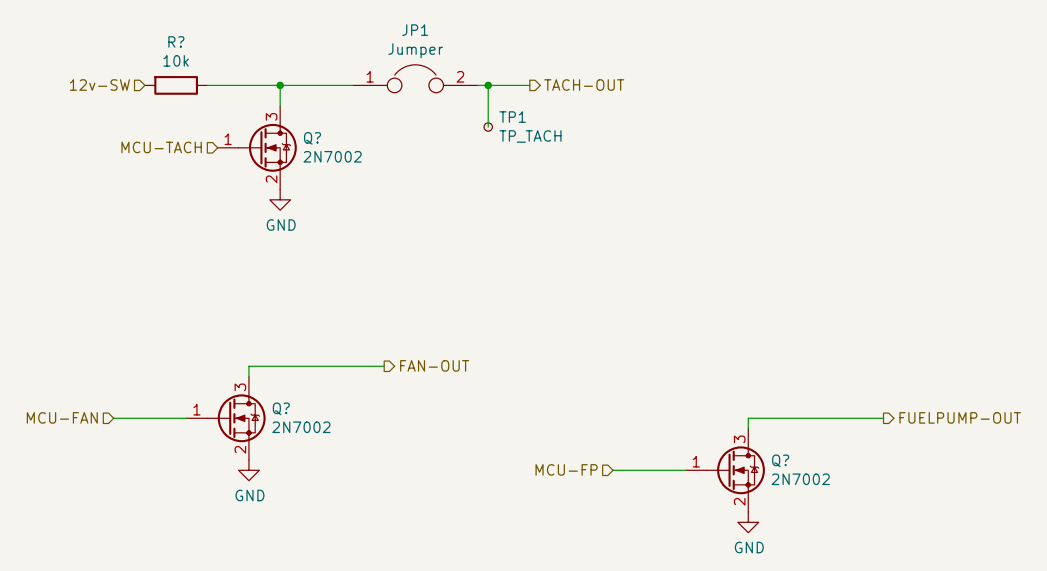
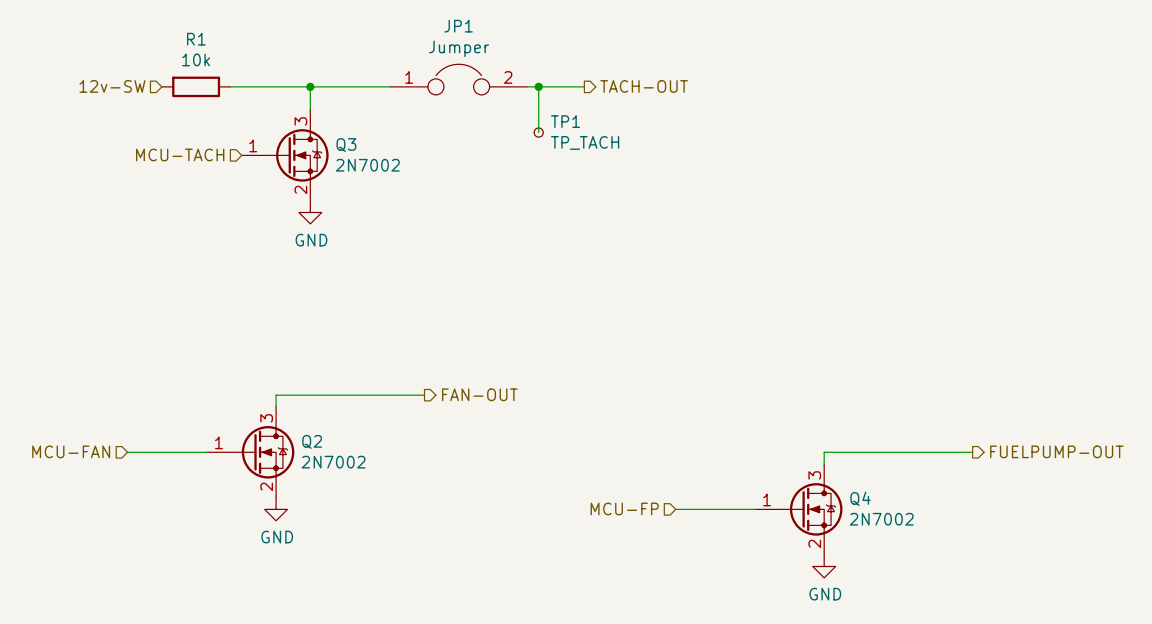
R? name: R? (176, 41) -> R1 (196, 39)
Q? name: Q? (312, 138) -> Q3 (346, 145)
Q? name: Q? (281, 408) -> Q2 (312, 441)
Q? name: Q? (780, 460) -> Q4 (860, 498)

